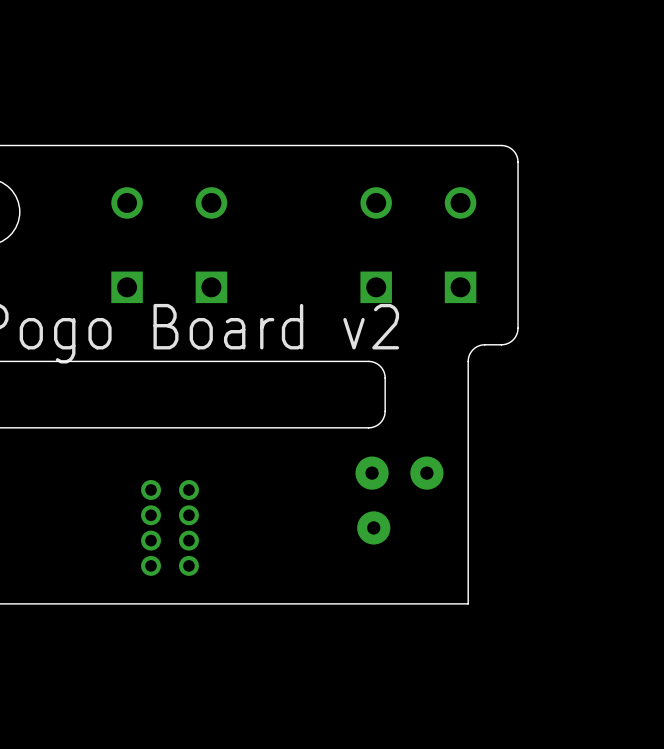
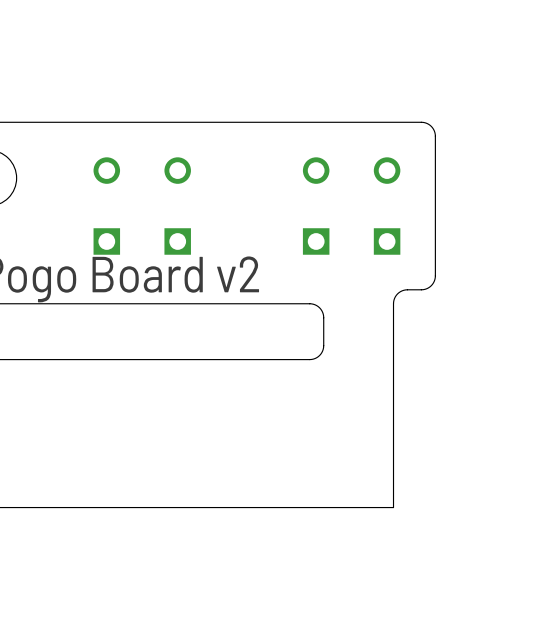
via: (372, 473) -> none
via: (426, 473) -> none
via: (151, 489) -> none
via: (188, 489) -> none
via: (151, 515) -> none
via: (188, 515) -> none
via: (373, 527) -> none
via: (151, 540) -> none
via: (188, 540) -> none
via: (151, 565) -> none
via: (188, 565) -> none

